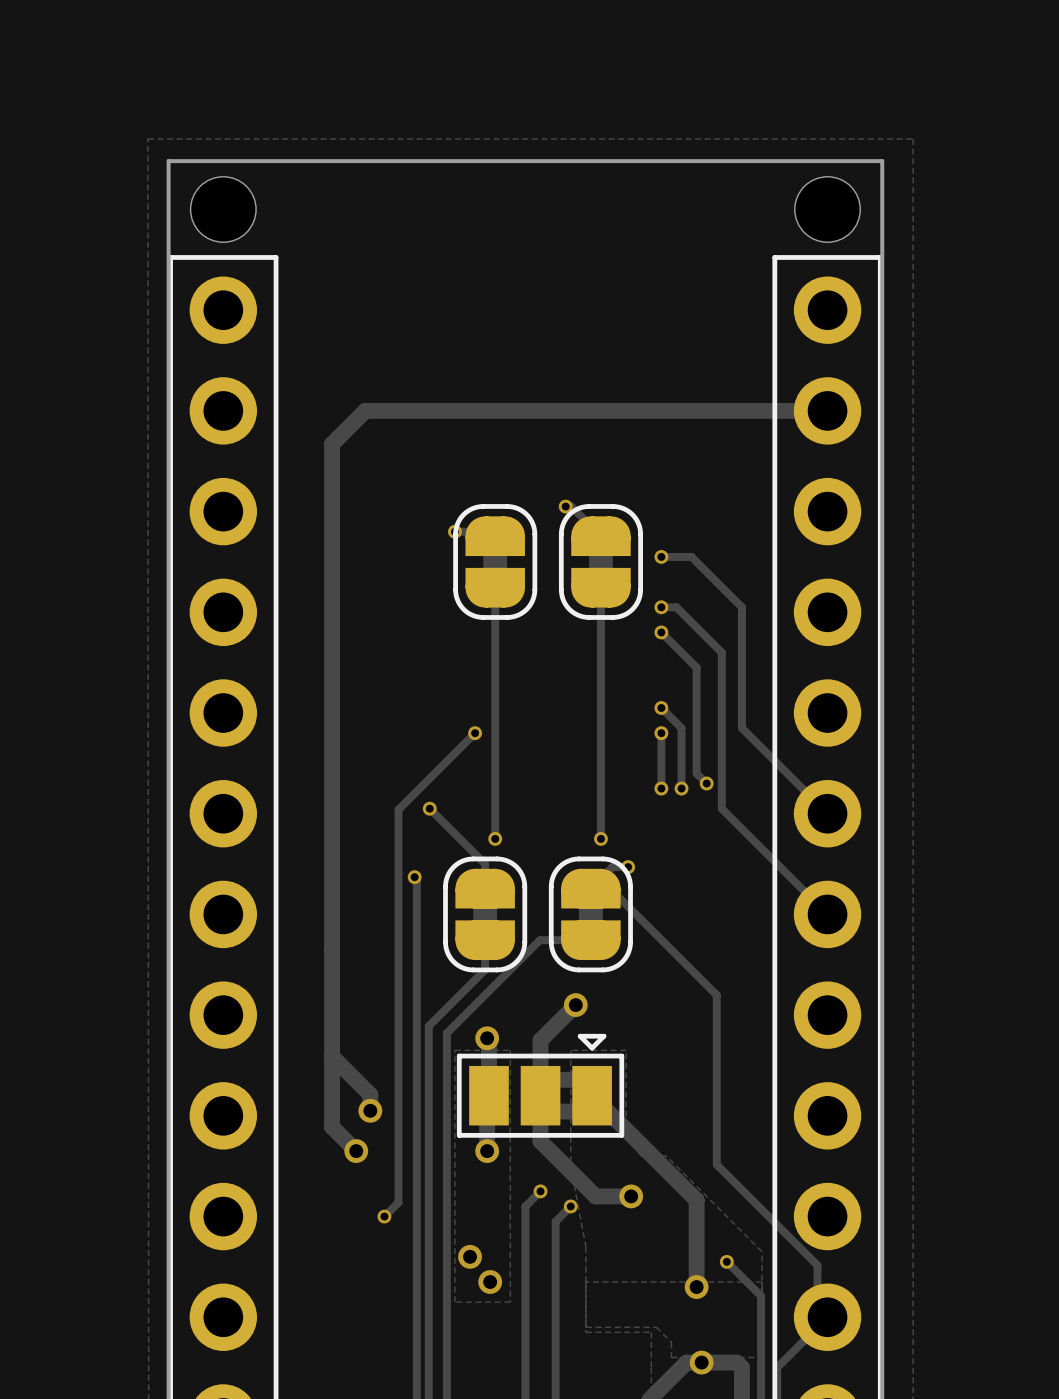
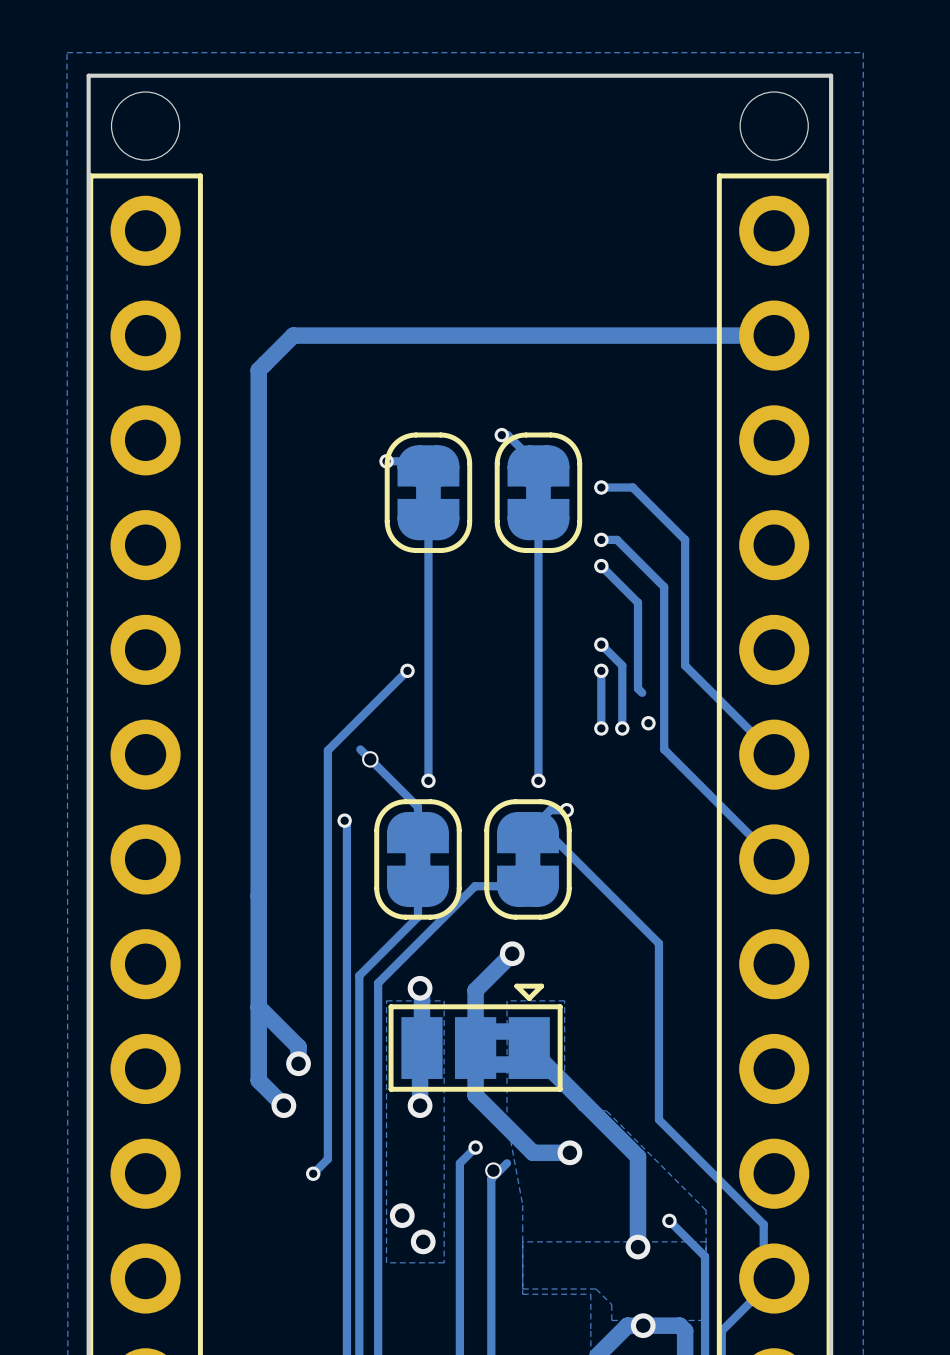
track: (696, 750) (696, 773) (706, 783) -> (638, 688) (642, 692)
via position: (429, 808) -> (370, 759)
via position: (570, 1206) -> (493, 1170)

